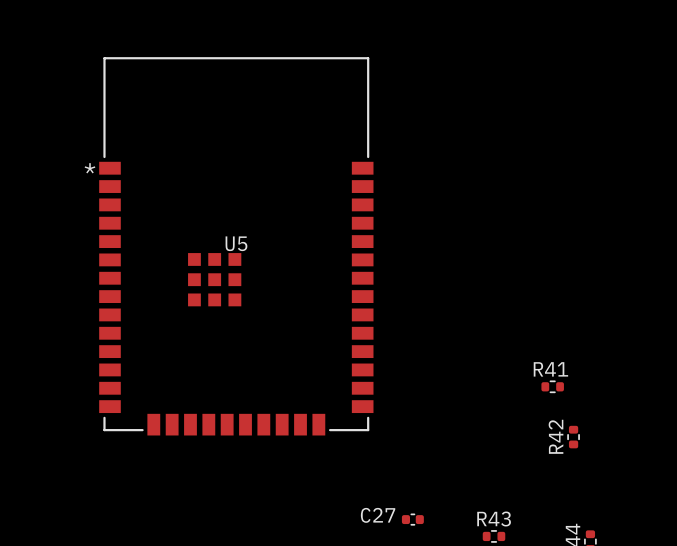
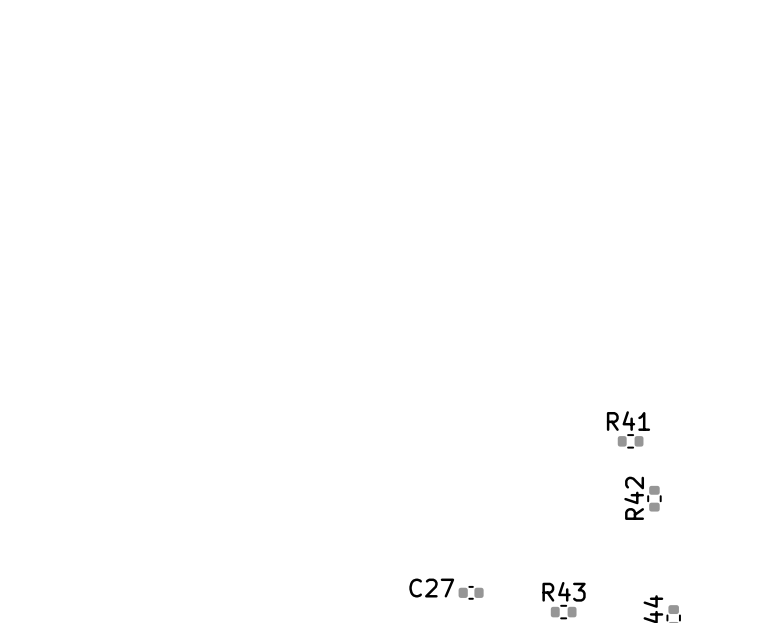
U5: (236, 246) -> none

